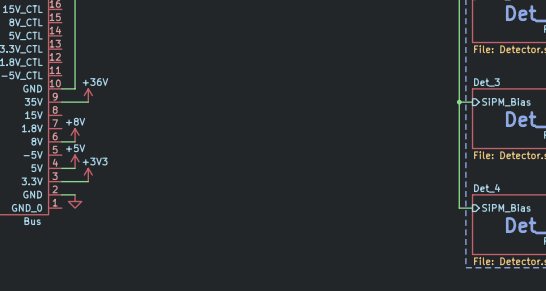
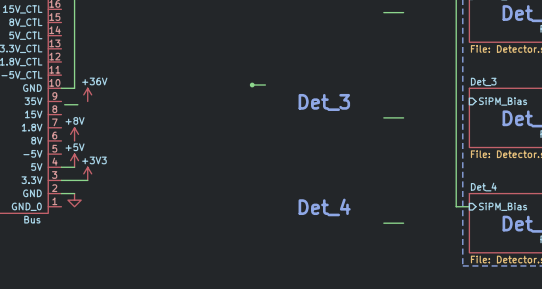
wire: none -> (383, 12) (403, 12)
wire: none -> (252, 85) (265, 85)
junction: none -> (252, 85)
wire: (61, 102) (88, 102) -> none
wire: (459, 102) (472, 102) -> none
junction: (459, 102) -> none
text: none -> Det_3 (324, 102)
wire: none -> (383, 117) (403, 117)
wire: (61, 141) (75, 141) -> (64, 104) (77, 104)
text: none -> Det_4 (324, 207)
wire: none -> (383, 223) (403, 223)

